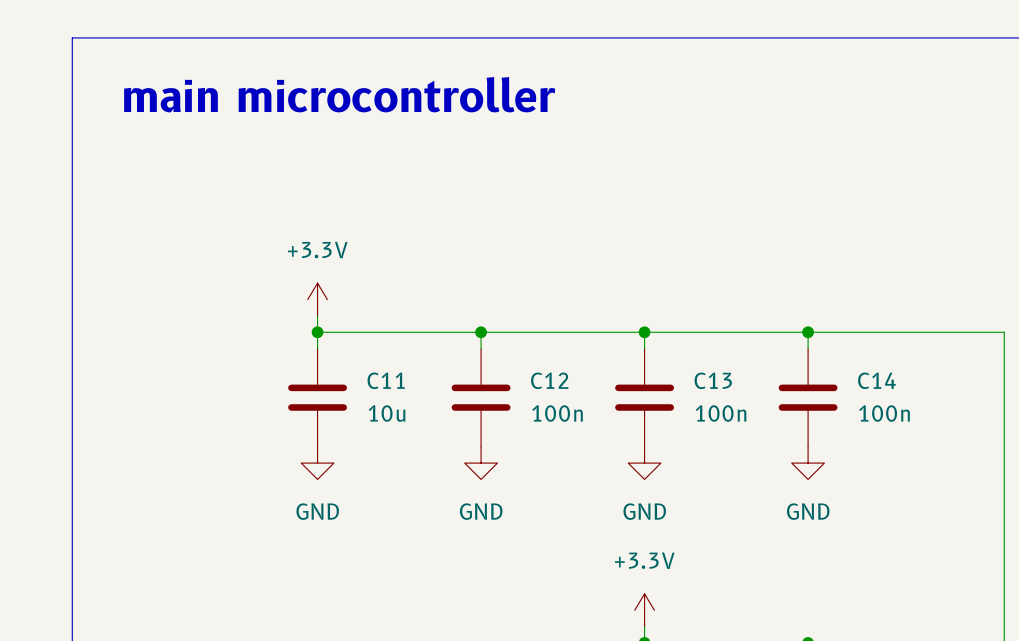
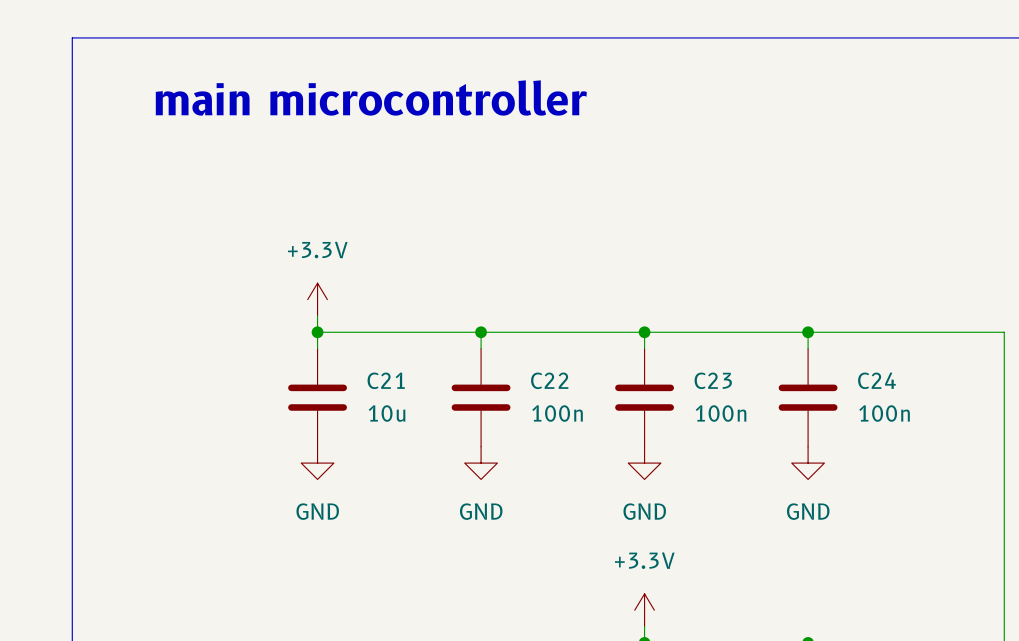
text position: main microcontroller (339, 94) -> main microcontroller (371, 97)
C11 name: C11 (386, 380) -> C21 (386, 380)
C12 name: C12 (549, 380) -> C22 (549, 380)
C13 name: C13 (713, 380) -> C23 (713, 380)
C14 name: C14 (876, 380) -> C24 (876, 380)

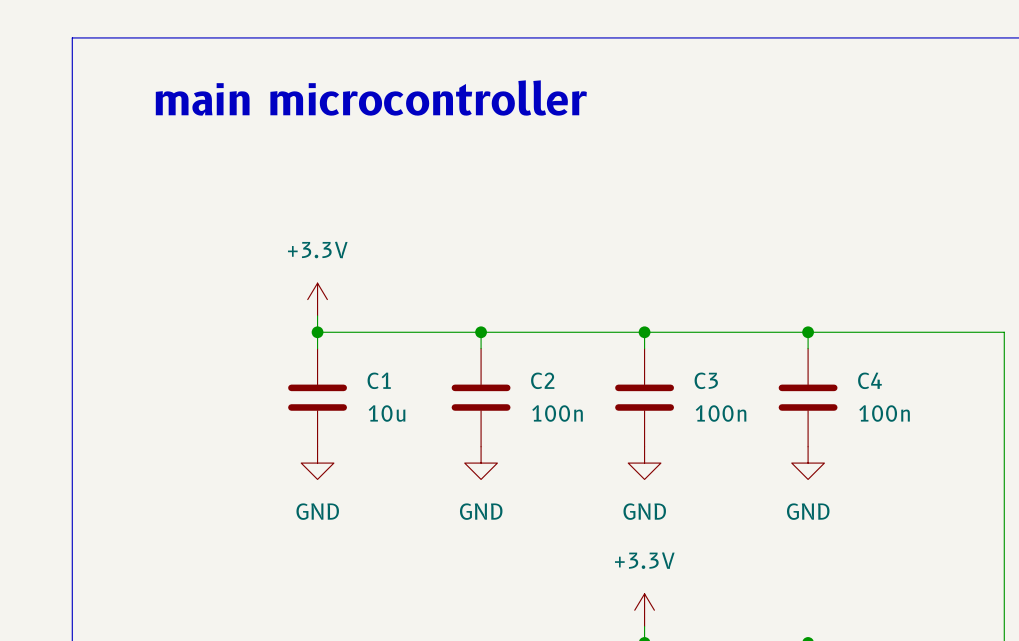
C21 name: C21 (386, 380) -> C1 (379, 380)
C22 name: C22 (549, 380) -> C2 (542, 380)
C23 name: C23 (713, 380) -> C3 (706, 380)
C24 name: C24 (876, 380) -> C4 (869, 380)

